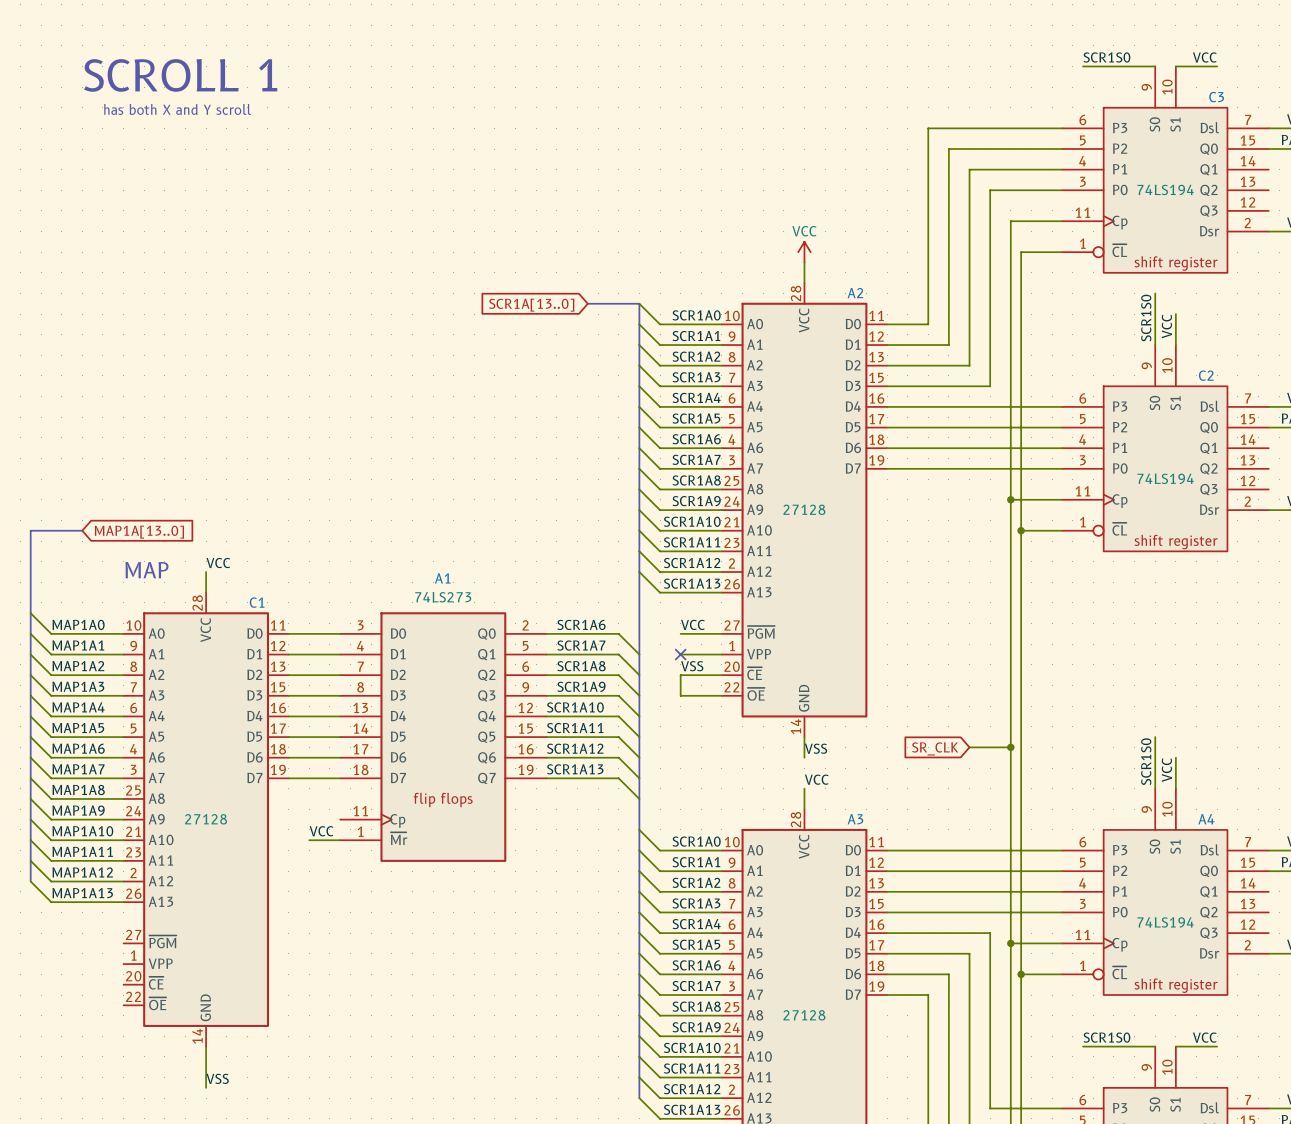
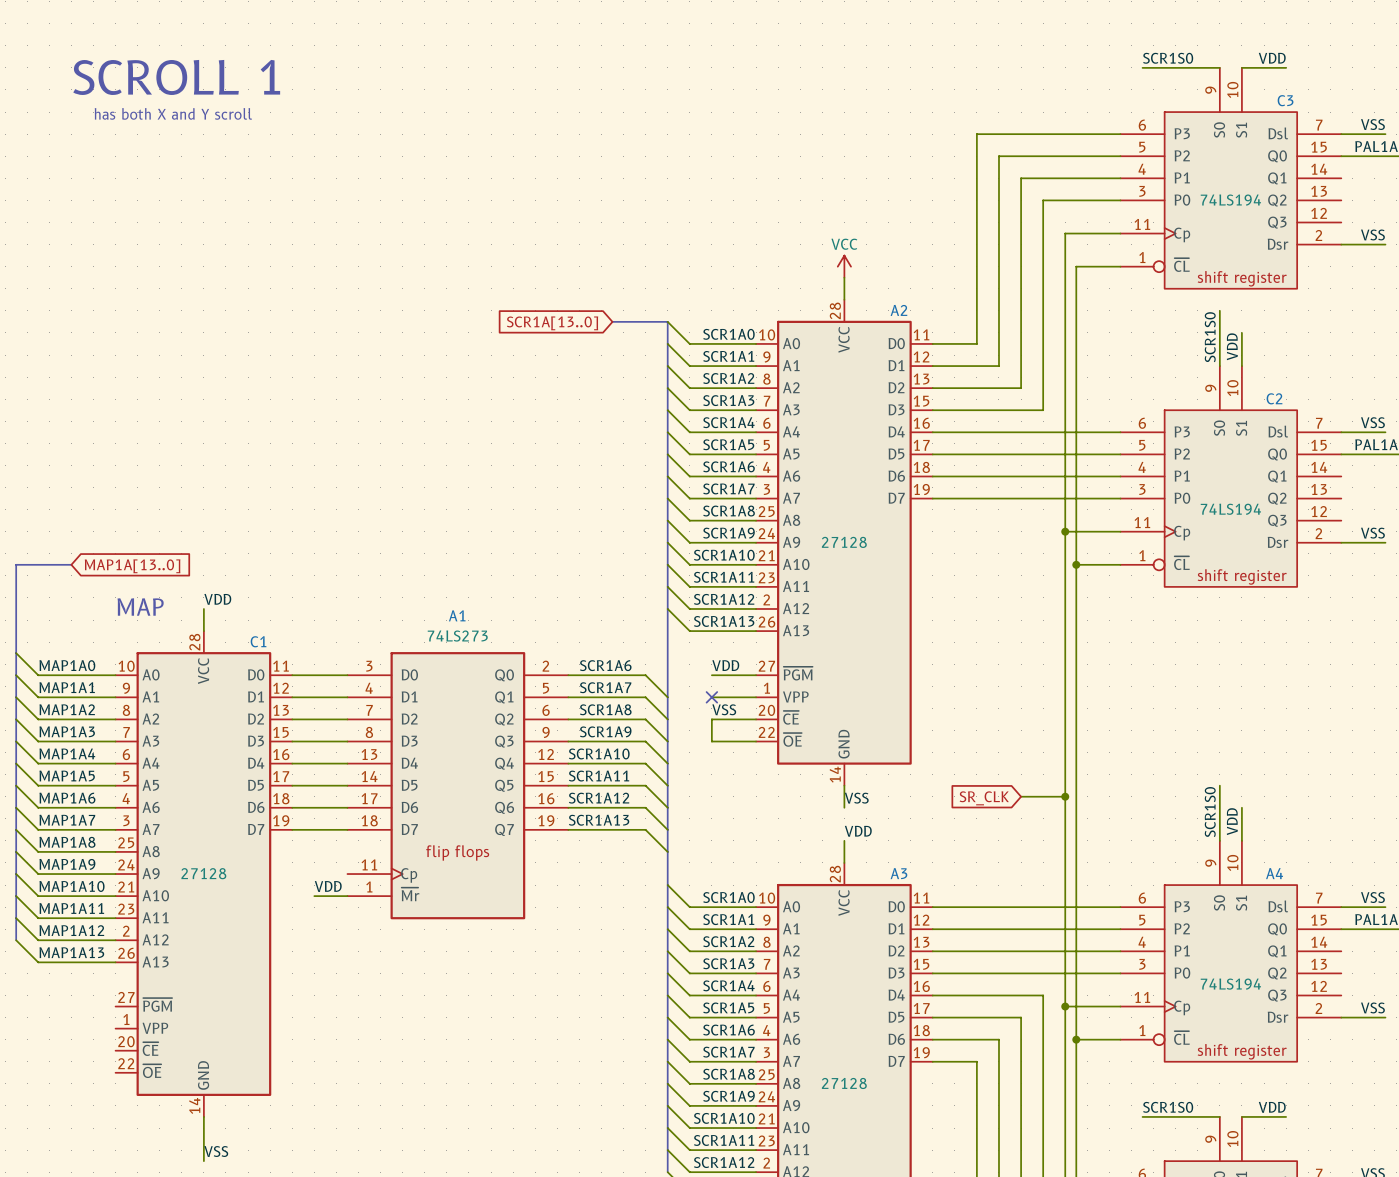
label: VCC (1204, 57) -> VDD (1272, 58)
label: VCC (1166, 326) -> VDD (1232, 346)
label: VCC (218, 563) -> VDD (217, 599)
label: VCC (692, 624) -> VDD (725, 665)
label: VCC (1166, 770) -> VDD (1232, 821)
label: VCC (816, 779) -> VDD (858, 831)
label: VCC (321, 831) -> VDD (328, 886)
label: VCC (1204, 1037) -> VDD (1272, 1107)

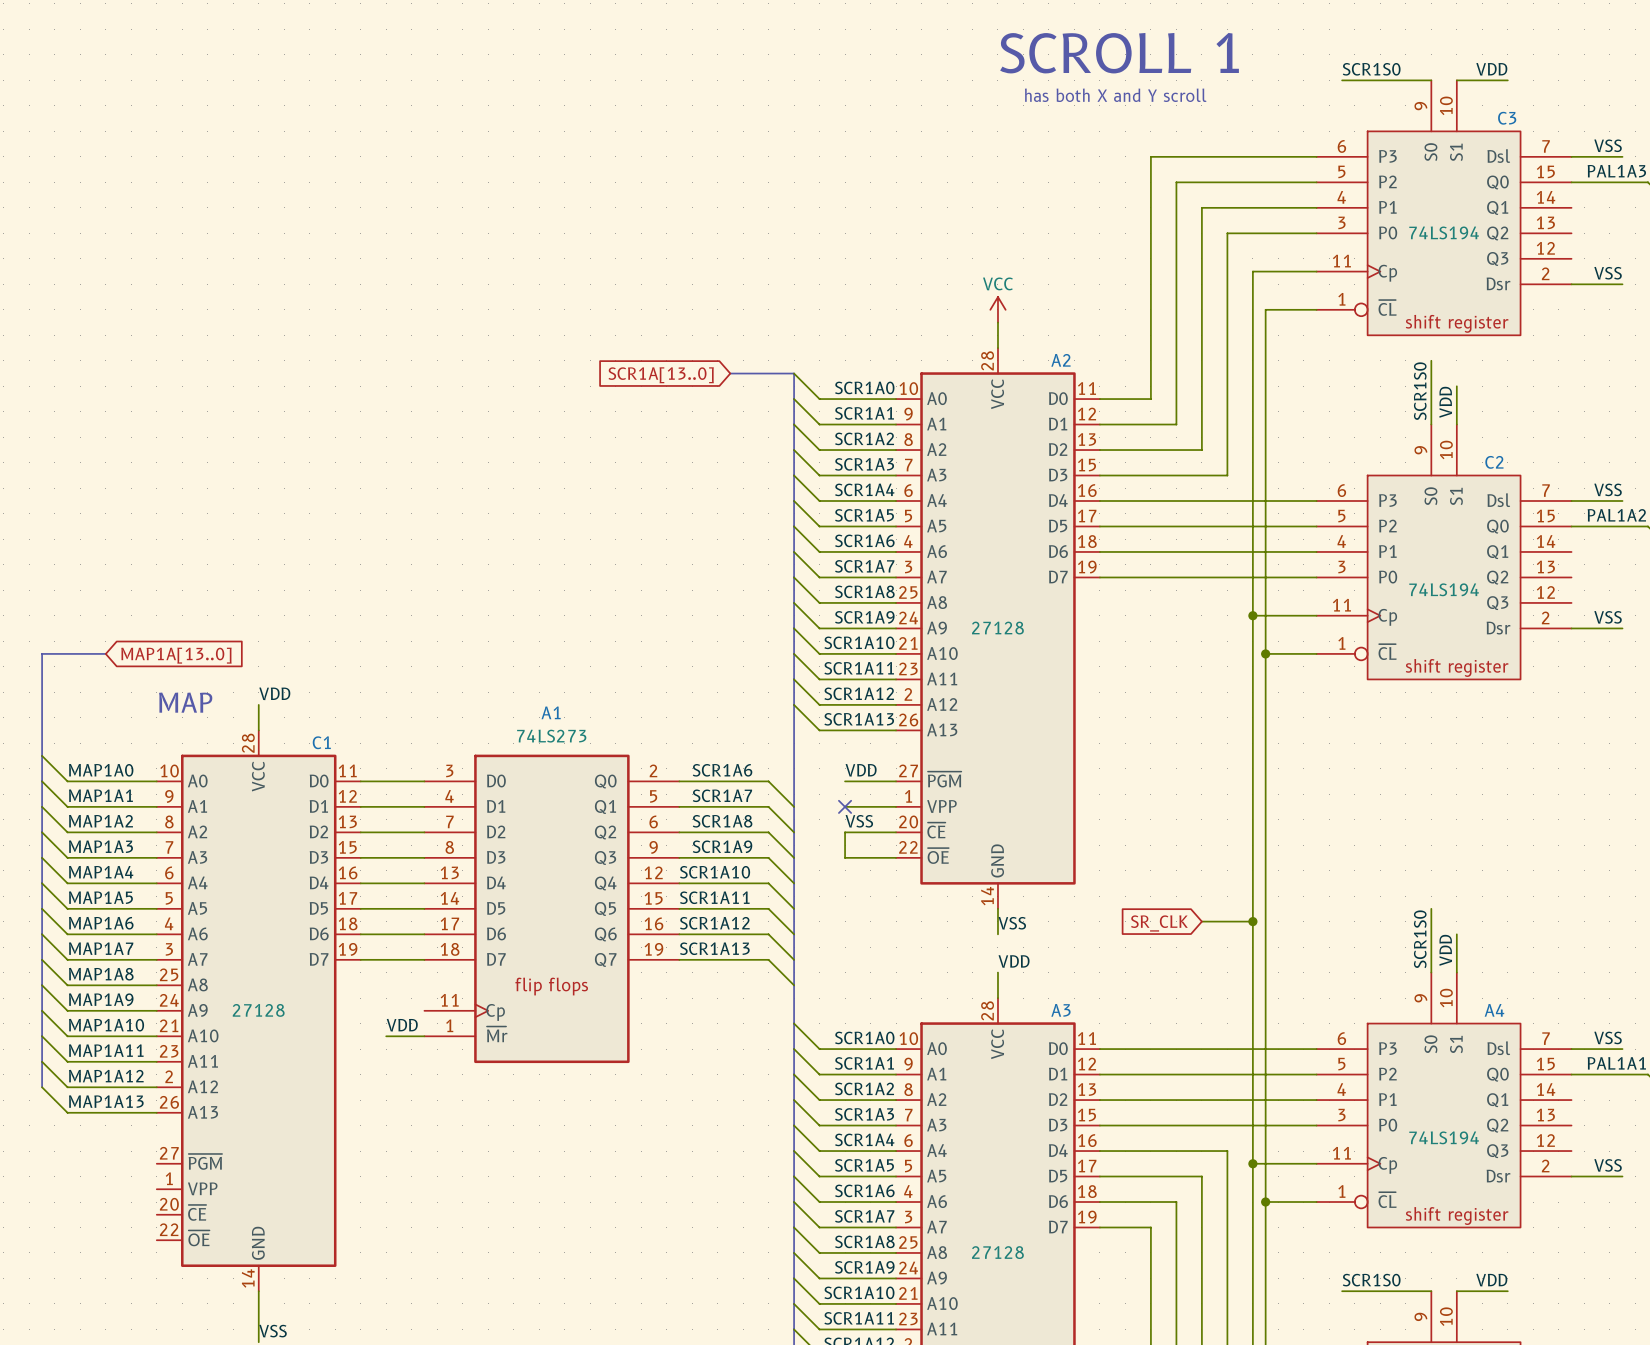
text: none -> SCROLL 1 (1119, 53)
text: SCROLL 1 (176, 77) -> none
text: none -> has both X and Y scroll (1115, 95)
text: has both X and Y scroll (173, 113) -> none

